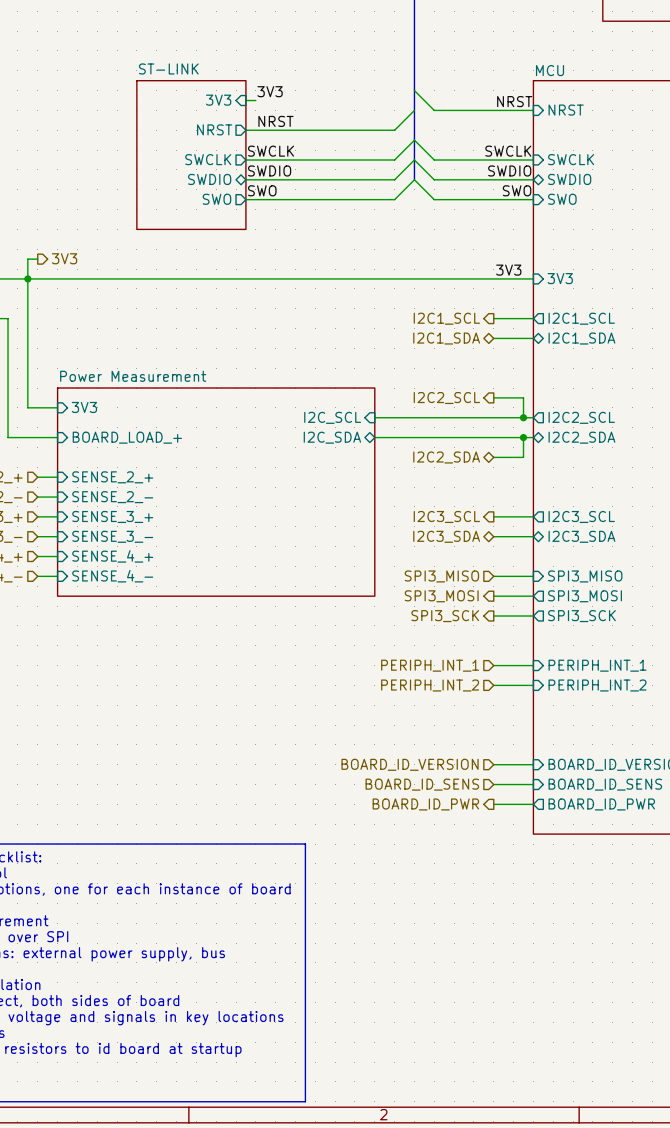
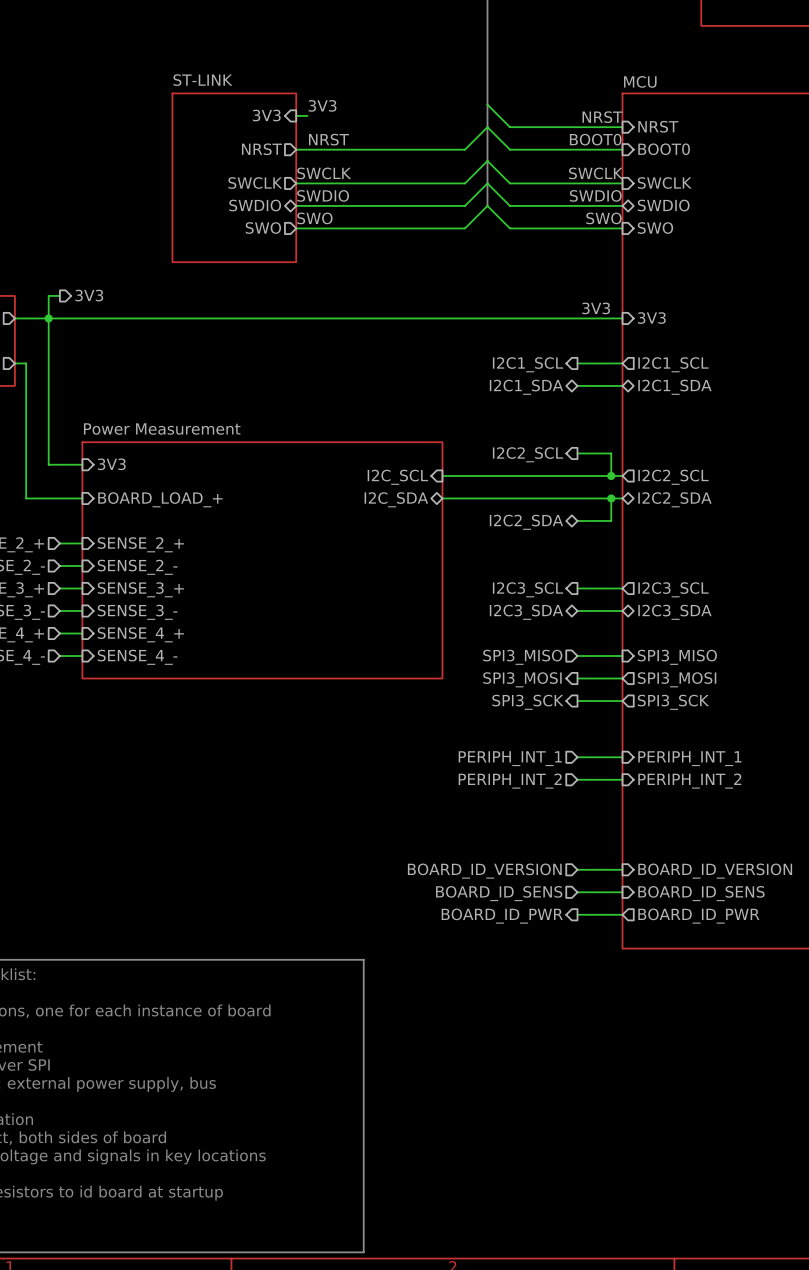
wire: none -> (487, 127) (509, 149) (622, 149)
label: none -> BOOT0 (595, 139)
sheet pin: none -> BOOT0 (664, 149)

